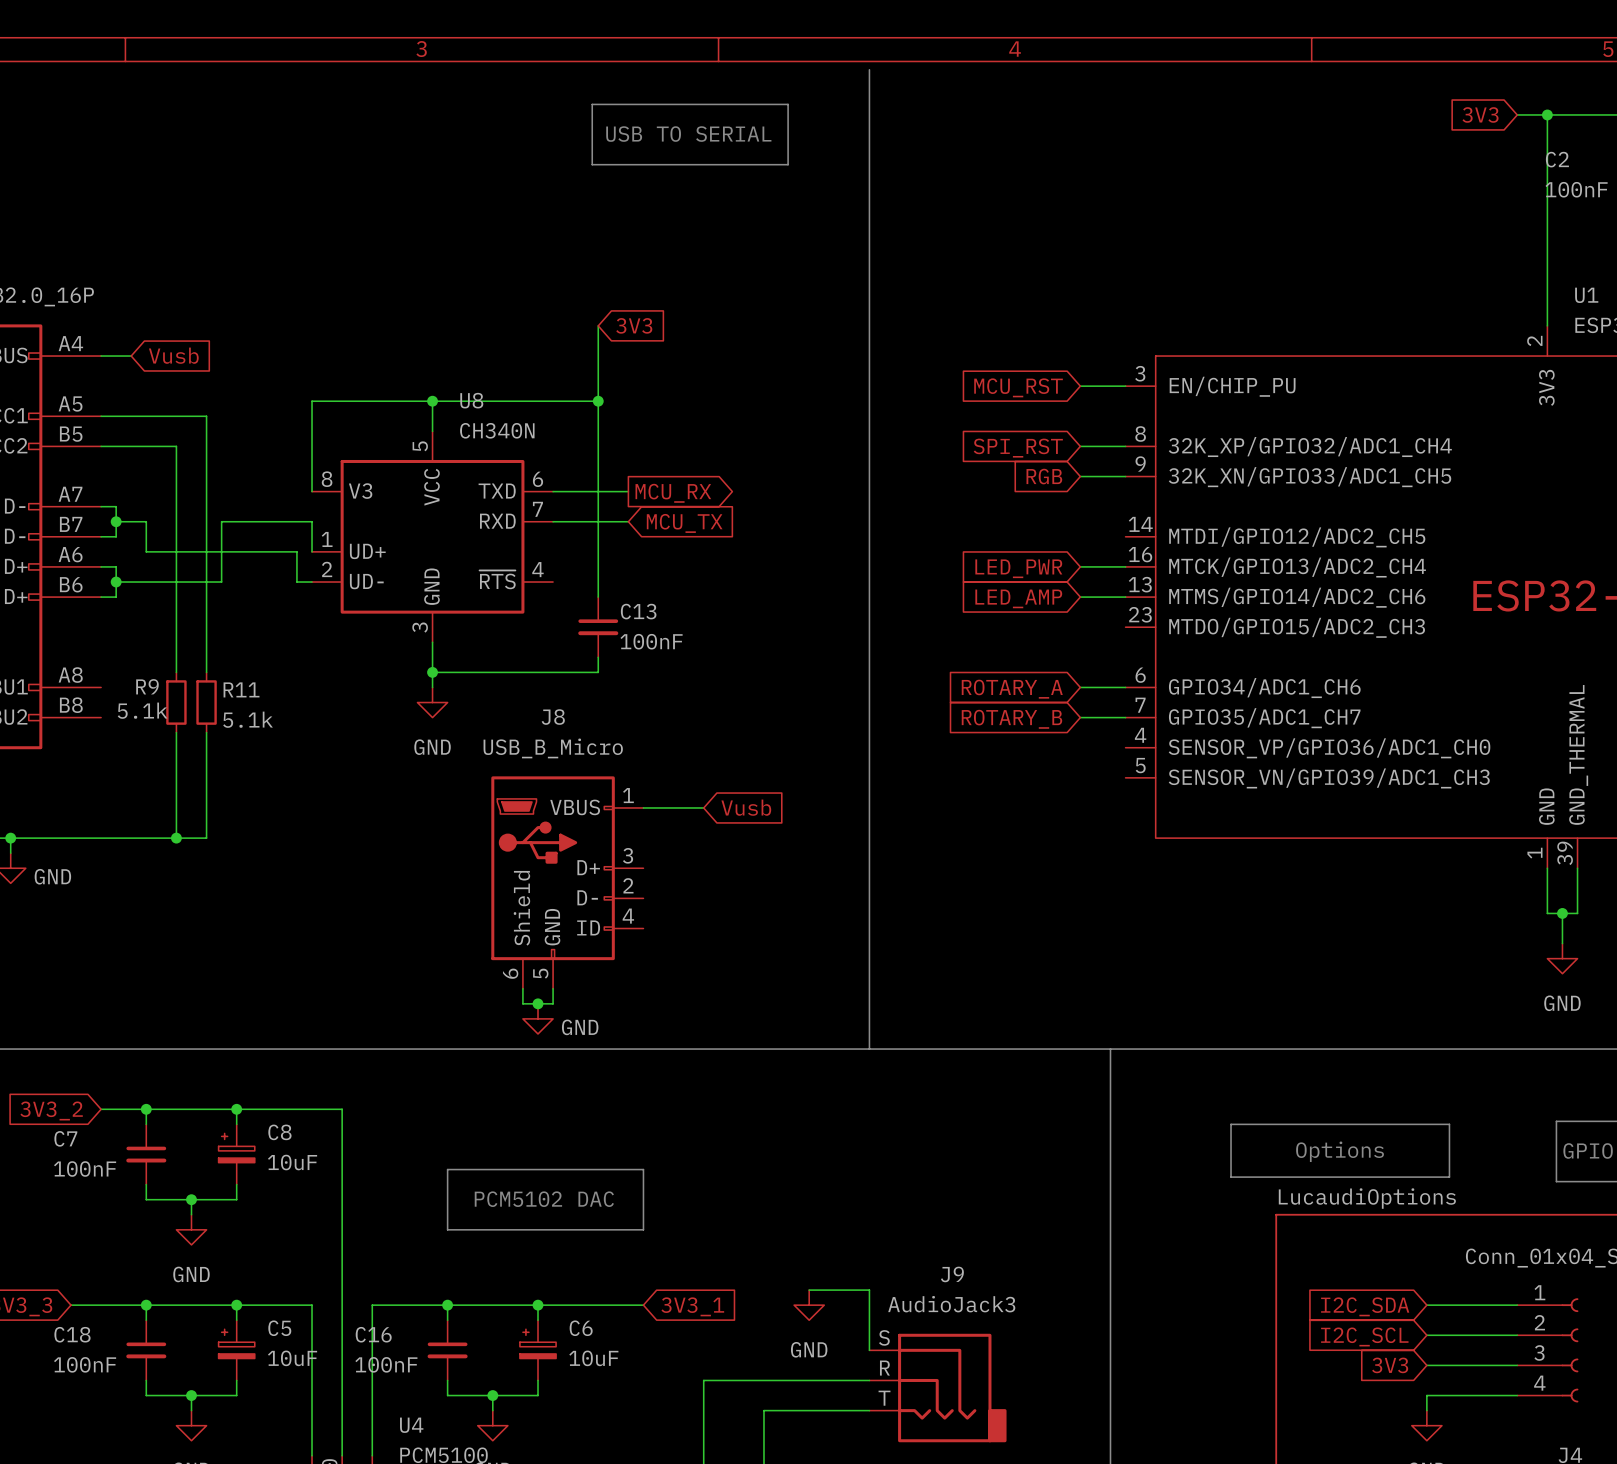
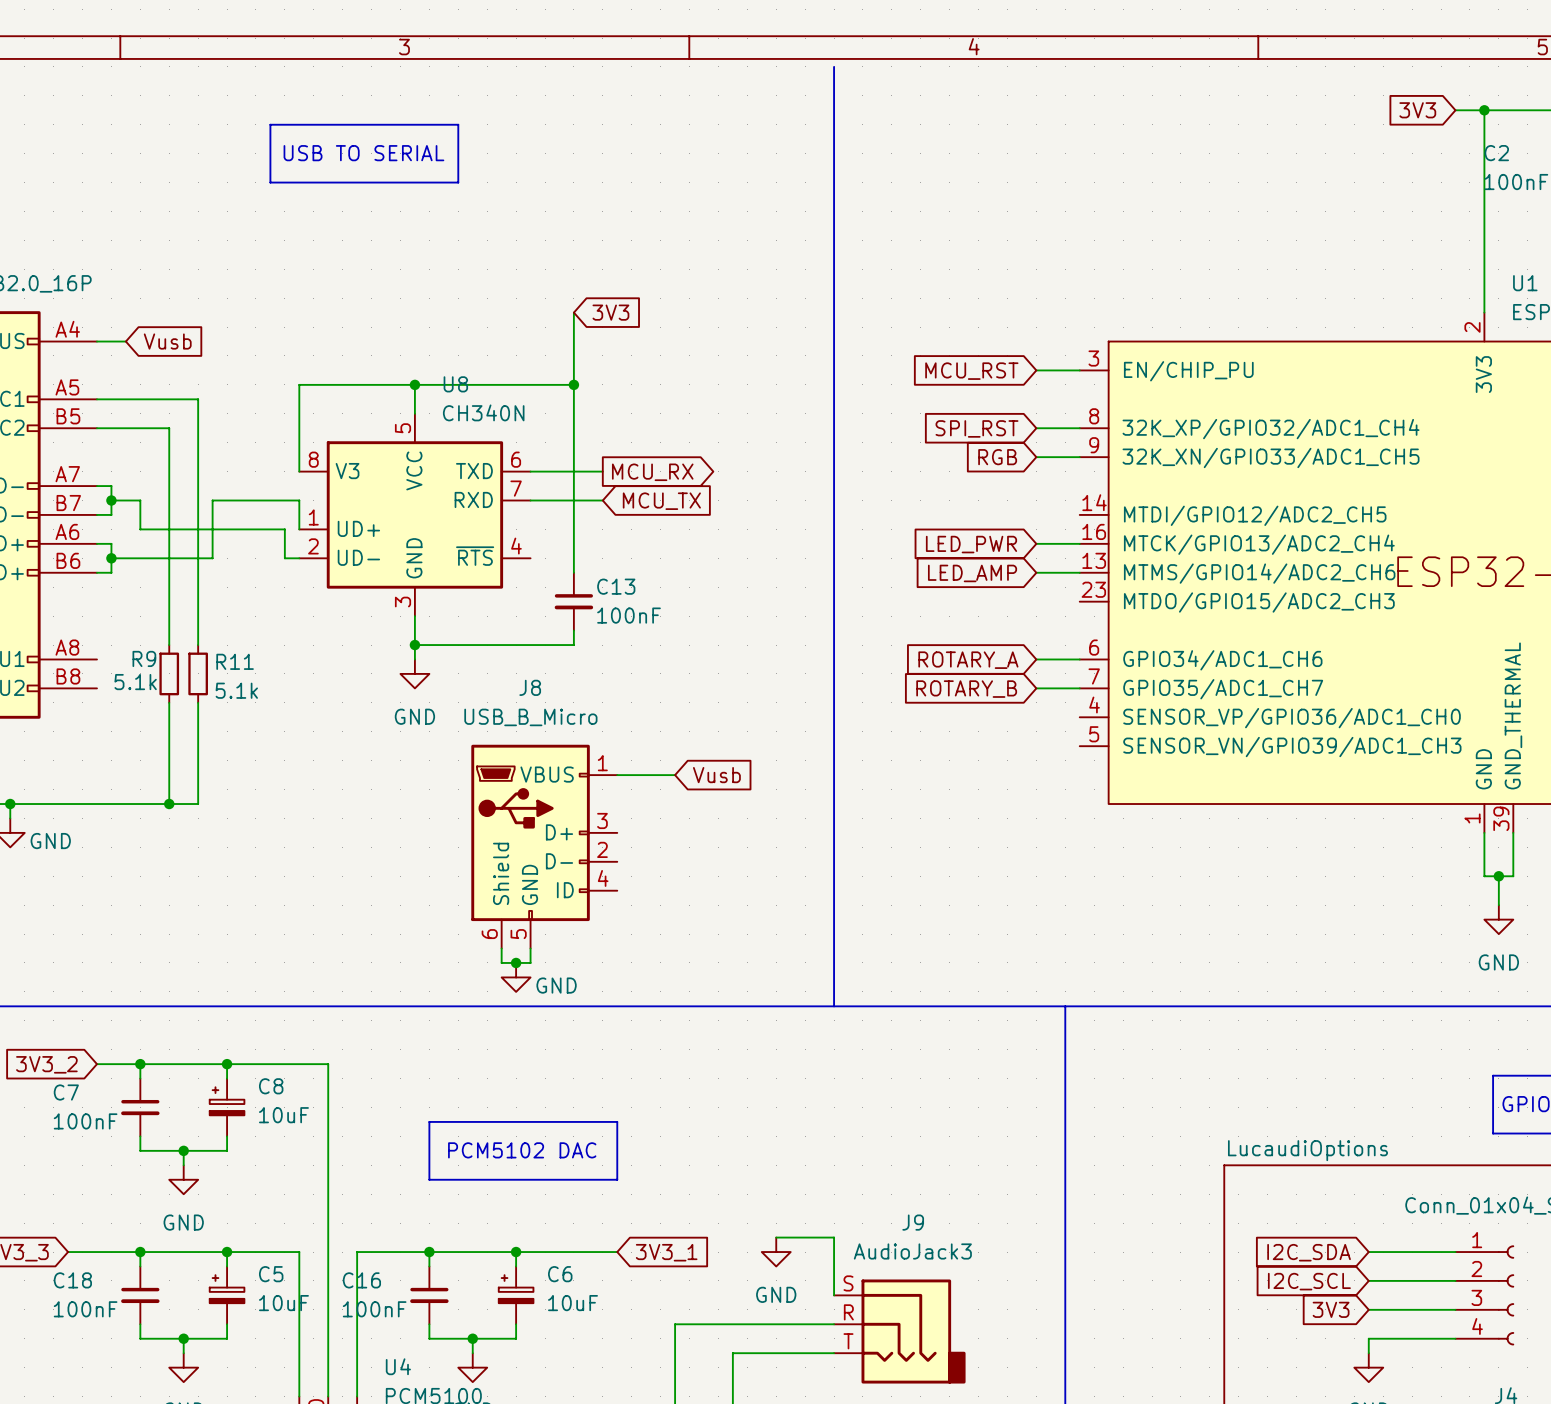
line: (592, 104) (788, 104) (788, 164) (592, 164) (592, 104) -> none
line: none -> (270, 124) (458, 124) (458, 182) (270, 182) (270, 124)
text: USB TO SERIAL (688, 134) -> none
text: none -> USB TO SERIAL (363, 153)
line: (1231, 1124) (1449, 1124) (1449, 1177) (1231, 1177) (1231, 1124) -> none
text: Options (1340, 1151) -> none

